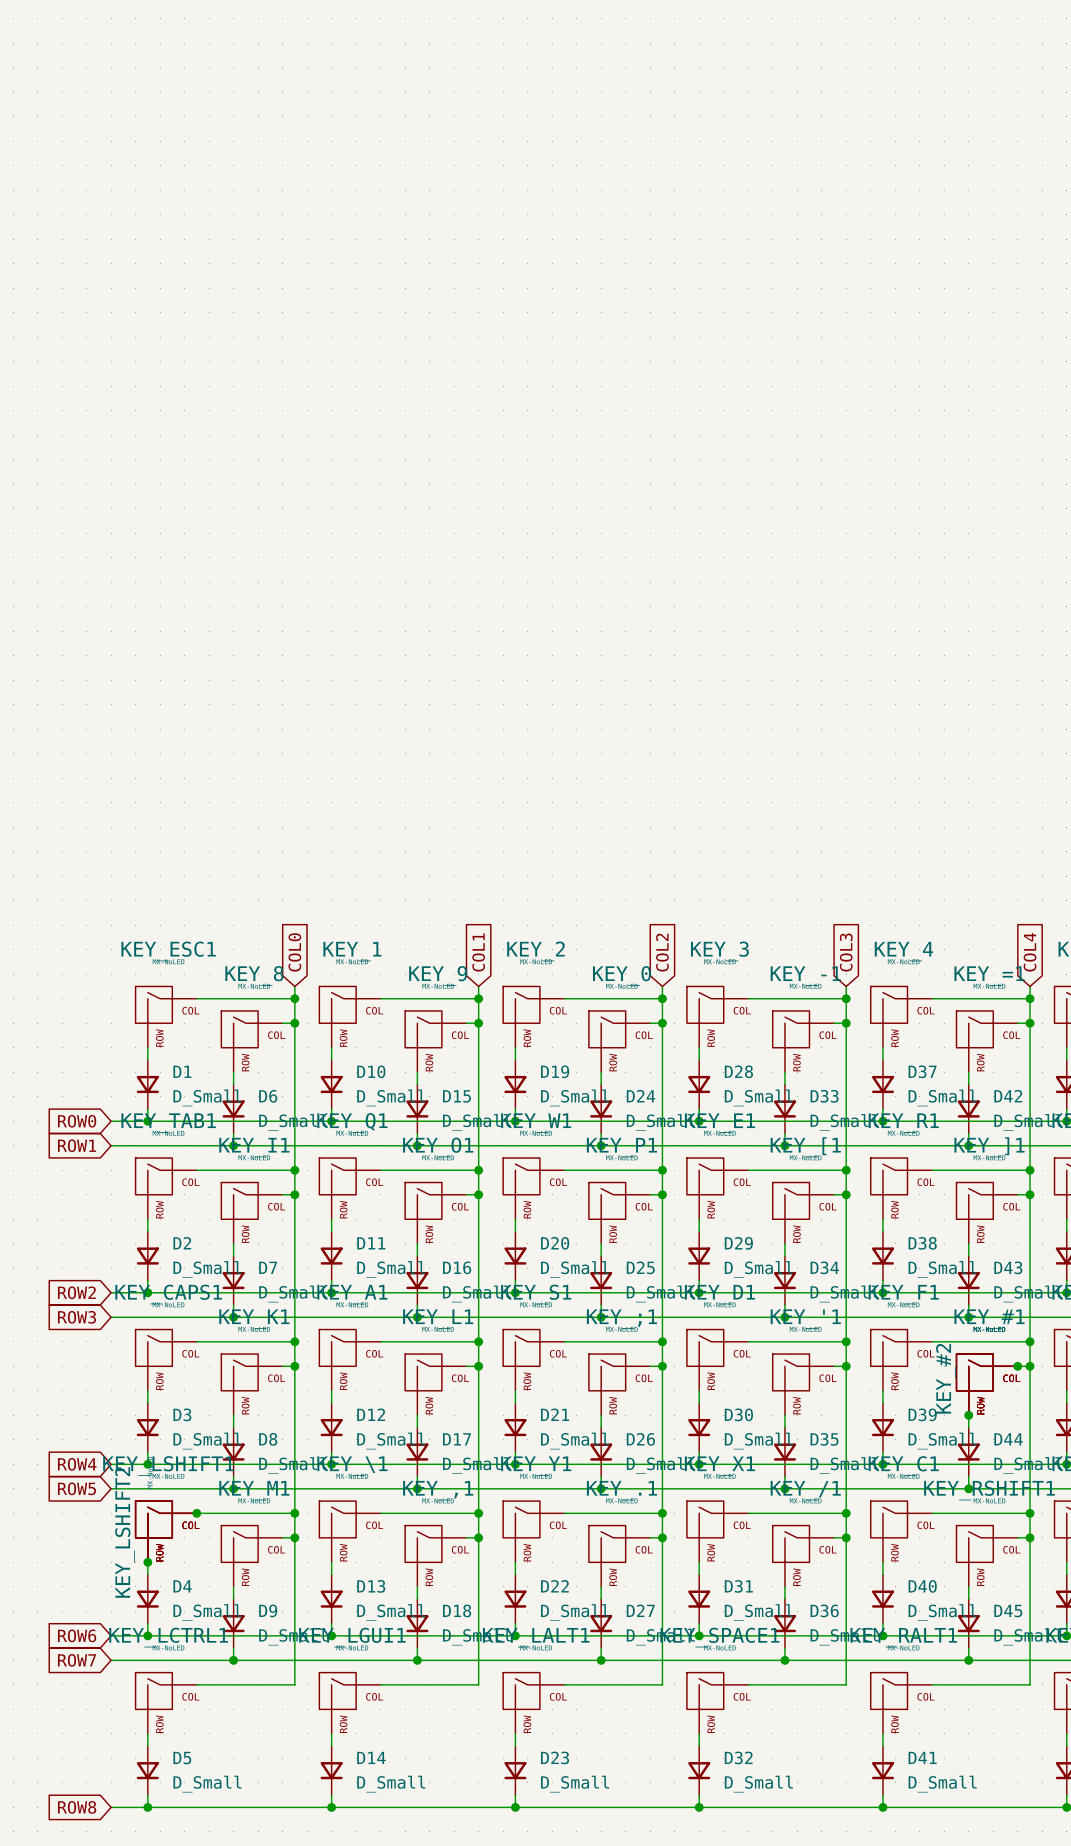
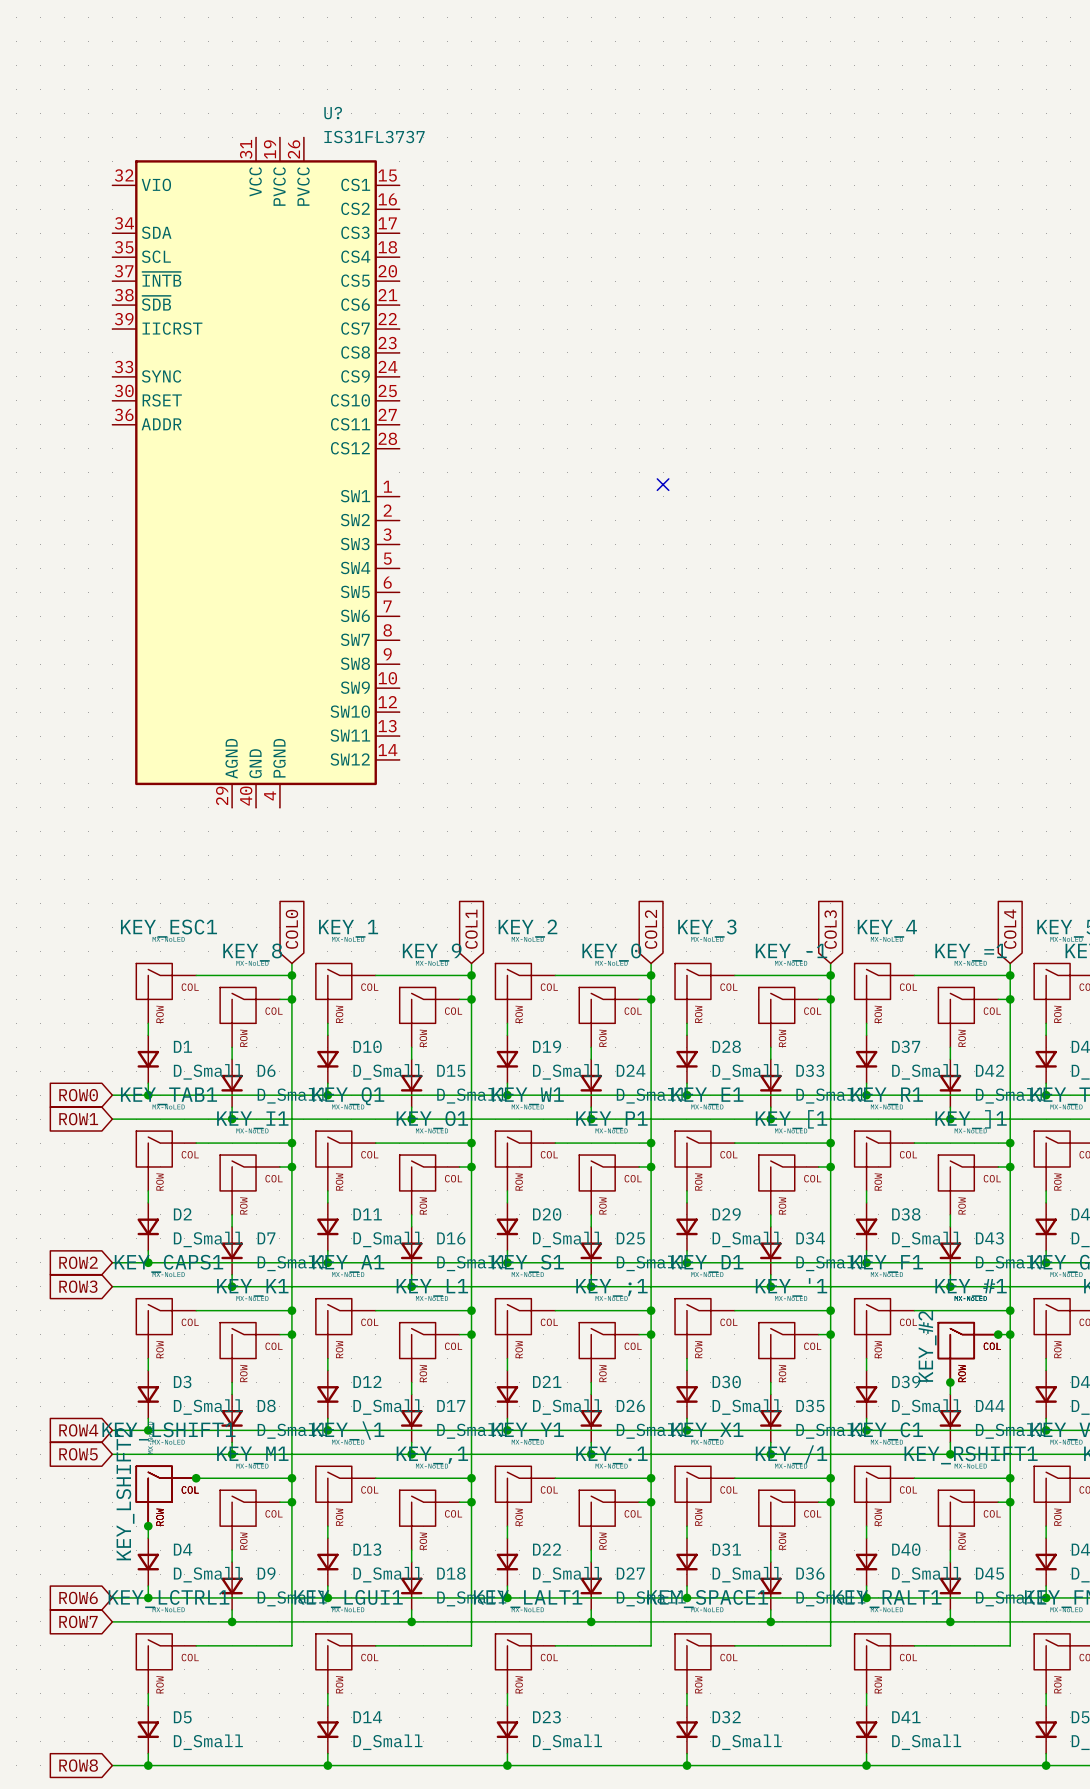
U?: none -> IS31FL3737 (256, 472)
no-connect mark: none -> (663, 484)

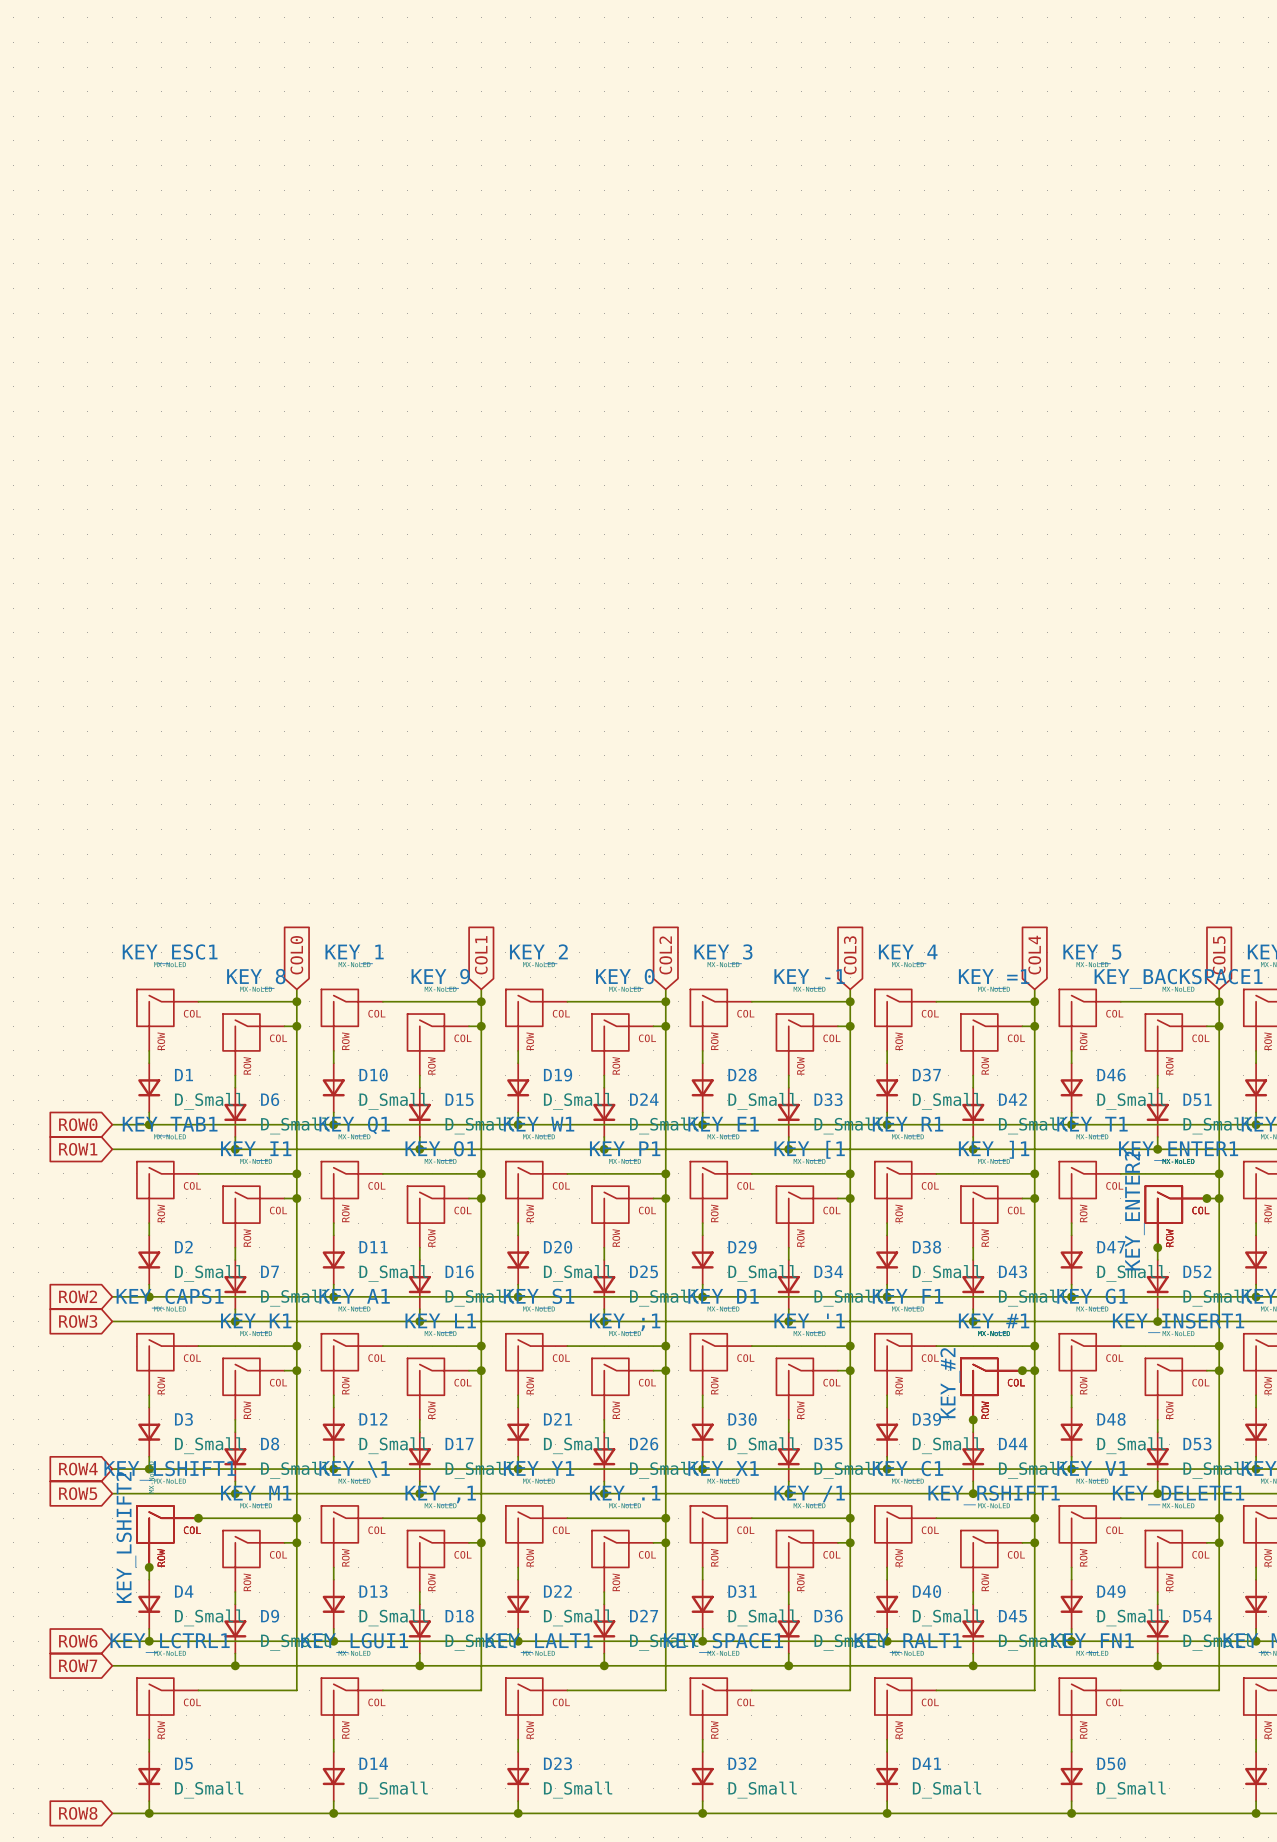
U?: IS31FL3737 (256, 472) -> none
no-connect mark: (663, 484) -> none

